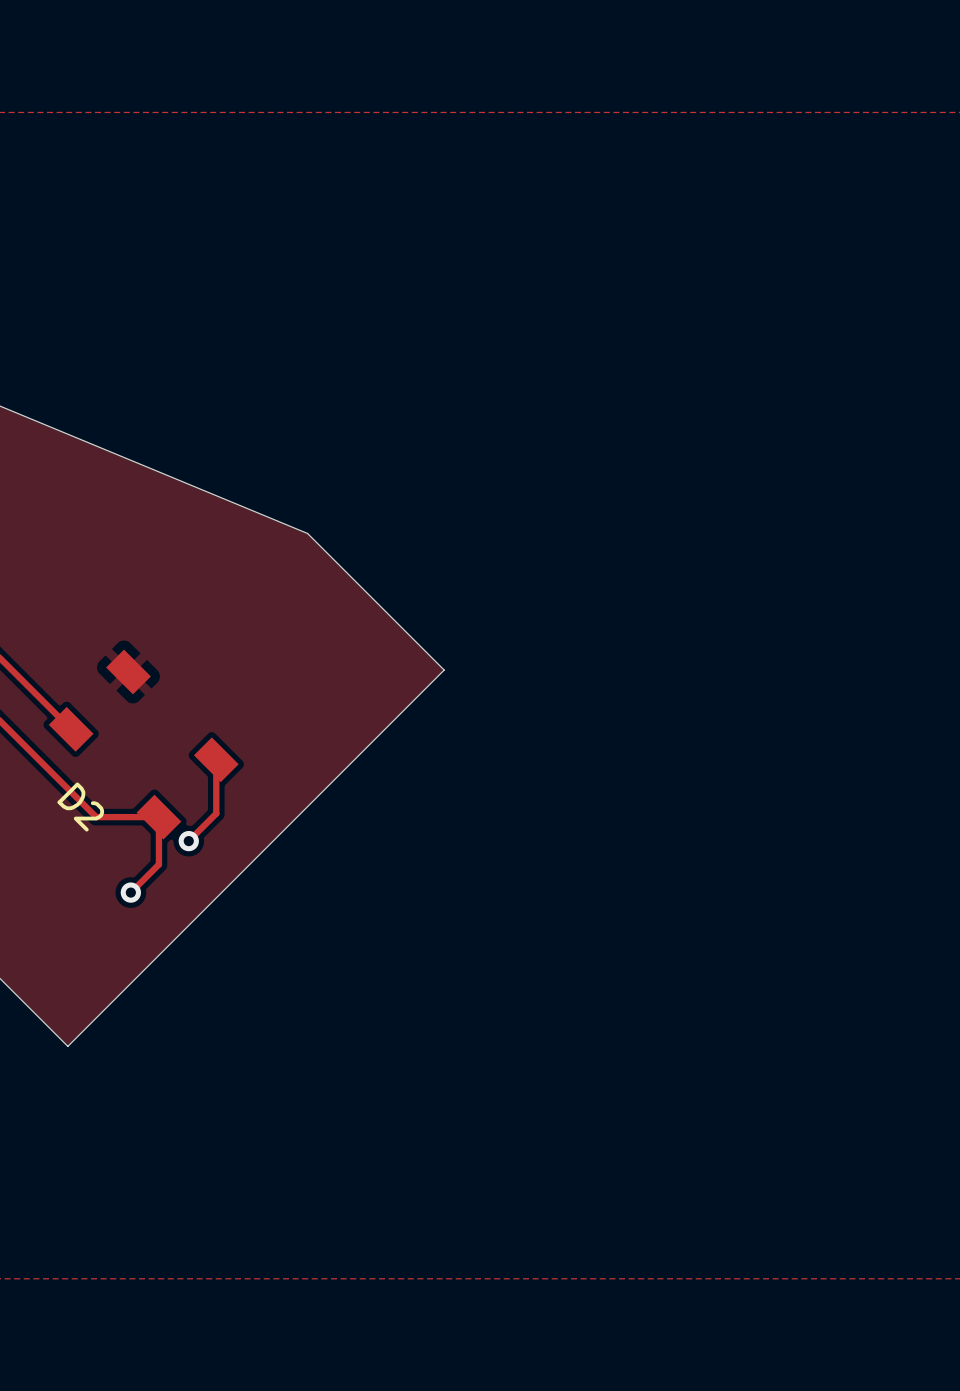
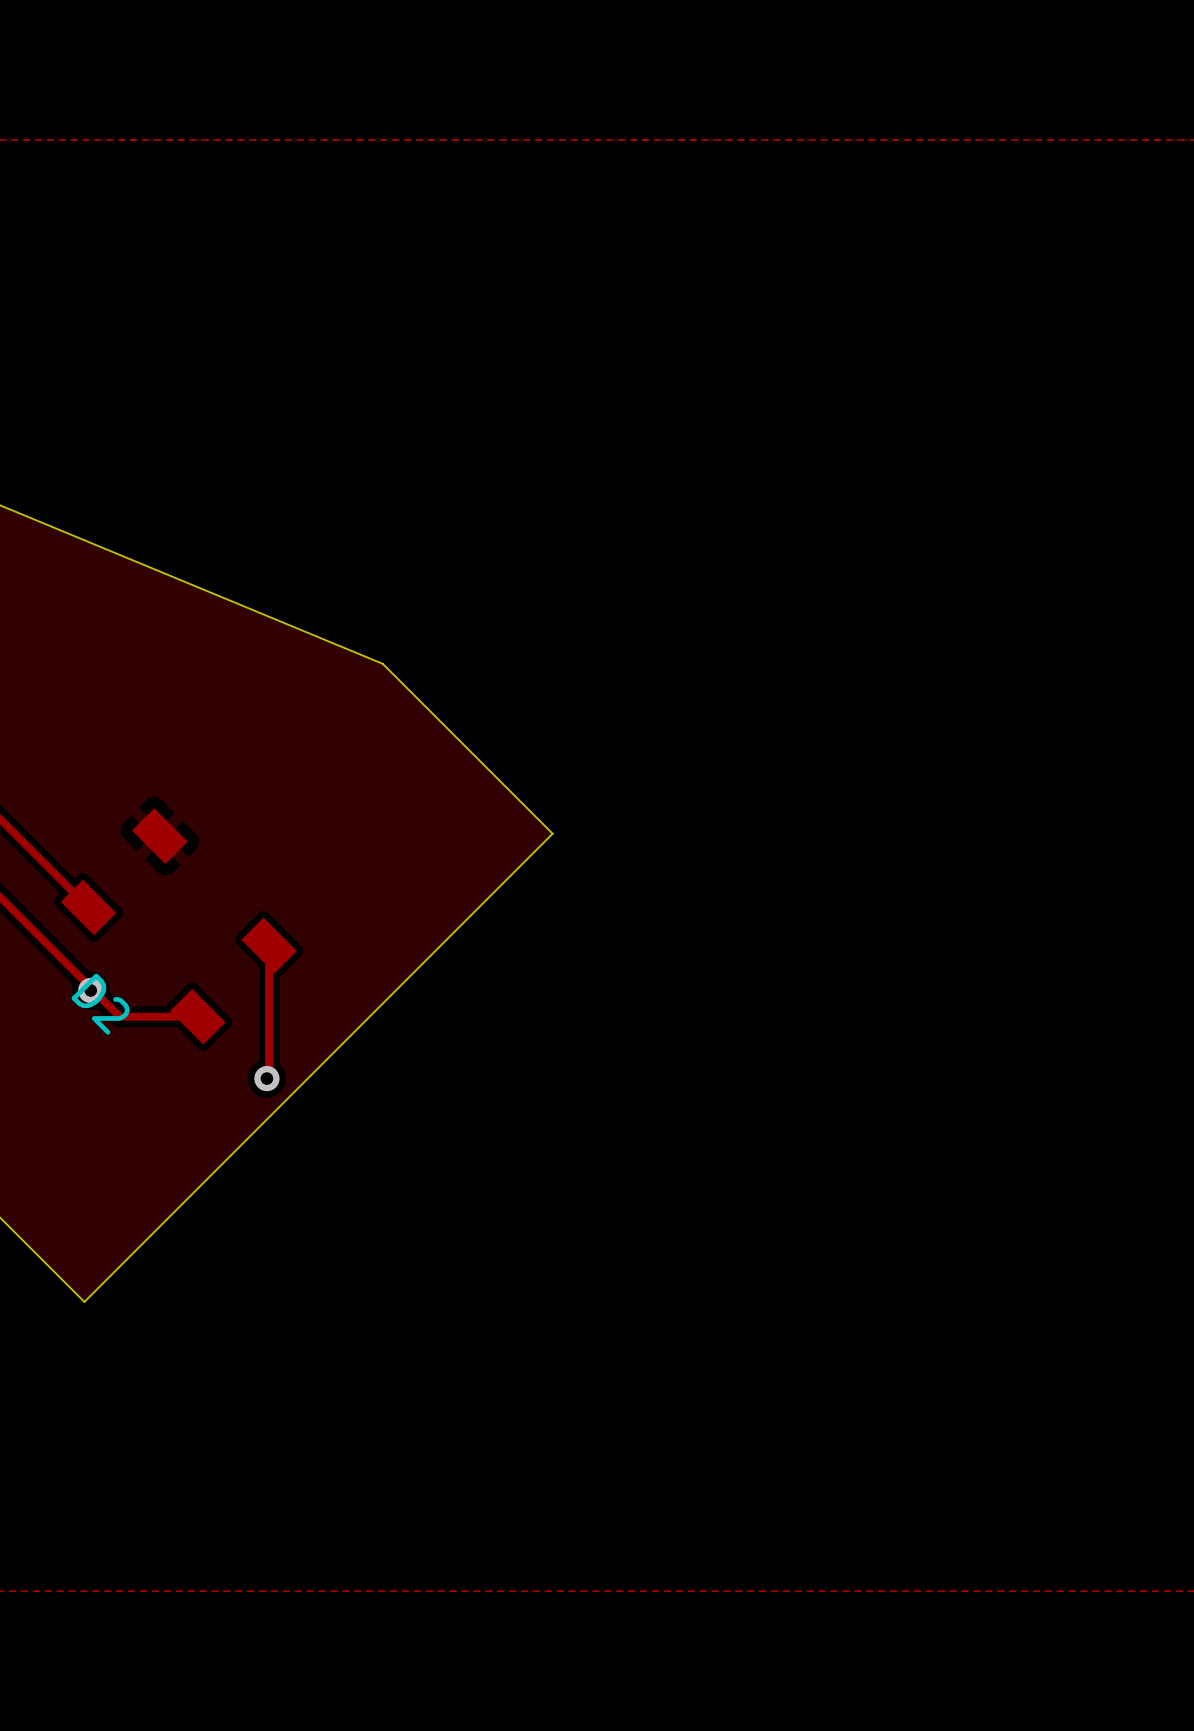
via: none -> (90, 990)
track: (216, 813) (188, 841) -> (269, 1012) (269, 1076) (266, 1078)
track: (158, 817) (158, 864) (130, 892) -> none
via position: (188, 841) -> (266, 1078)
via: (130, 892) -> none

